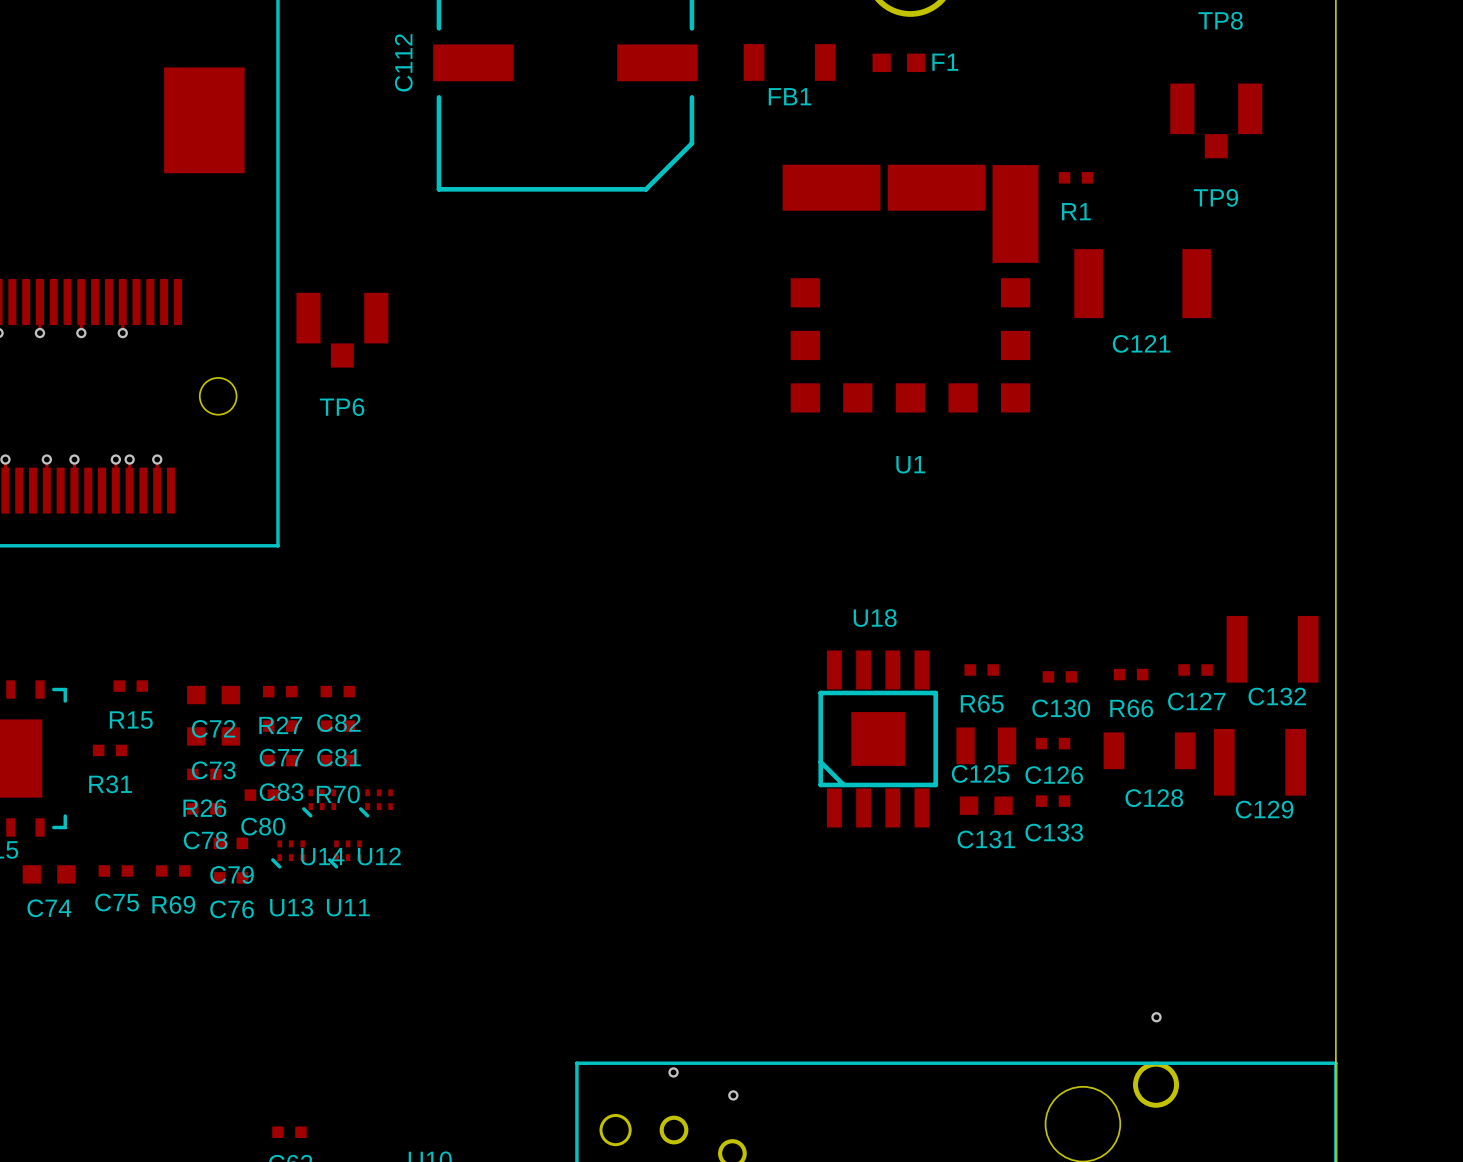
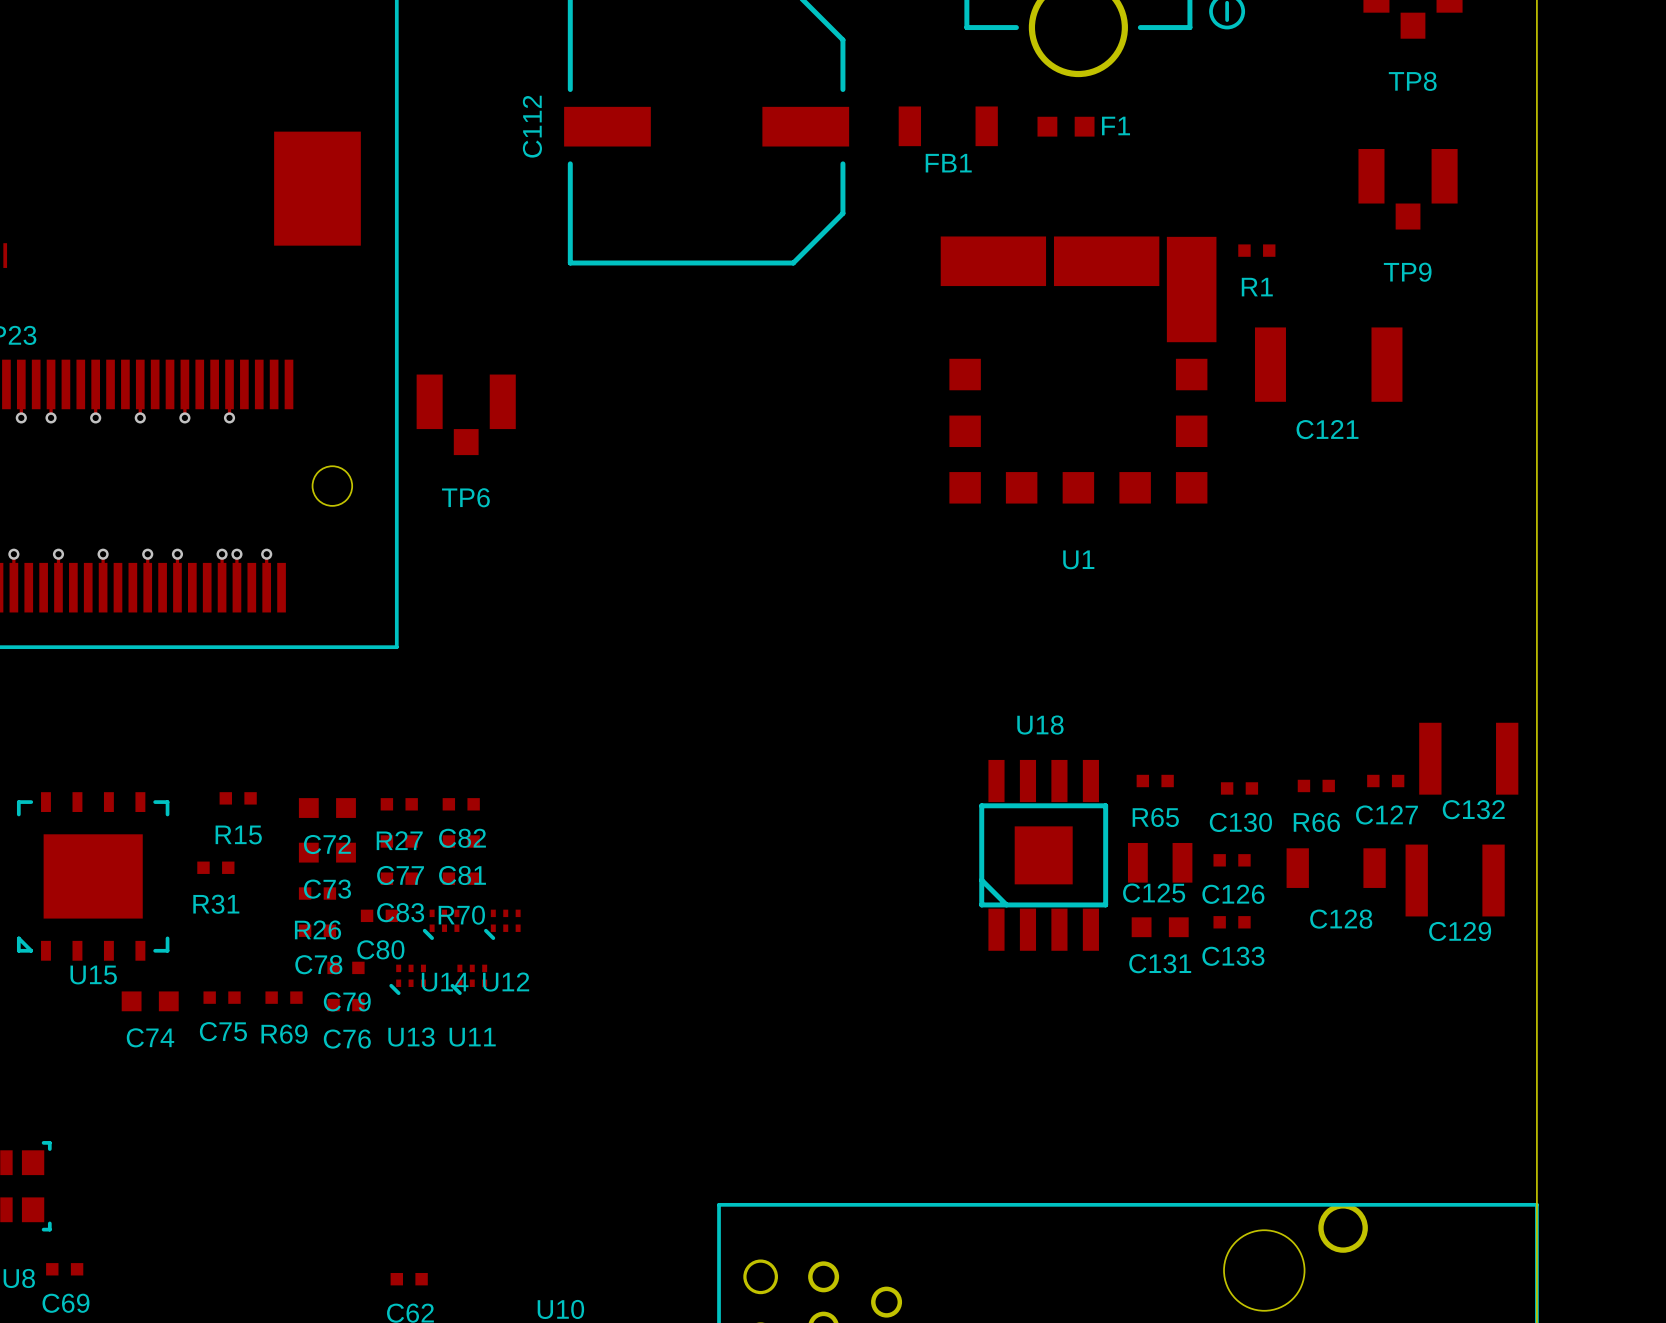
via: (1156, 1017) -> none
via: (673, 1072) -> none
via: (733, 1095) -> none

